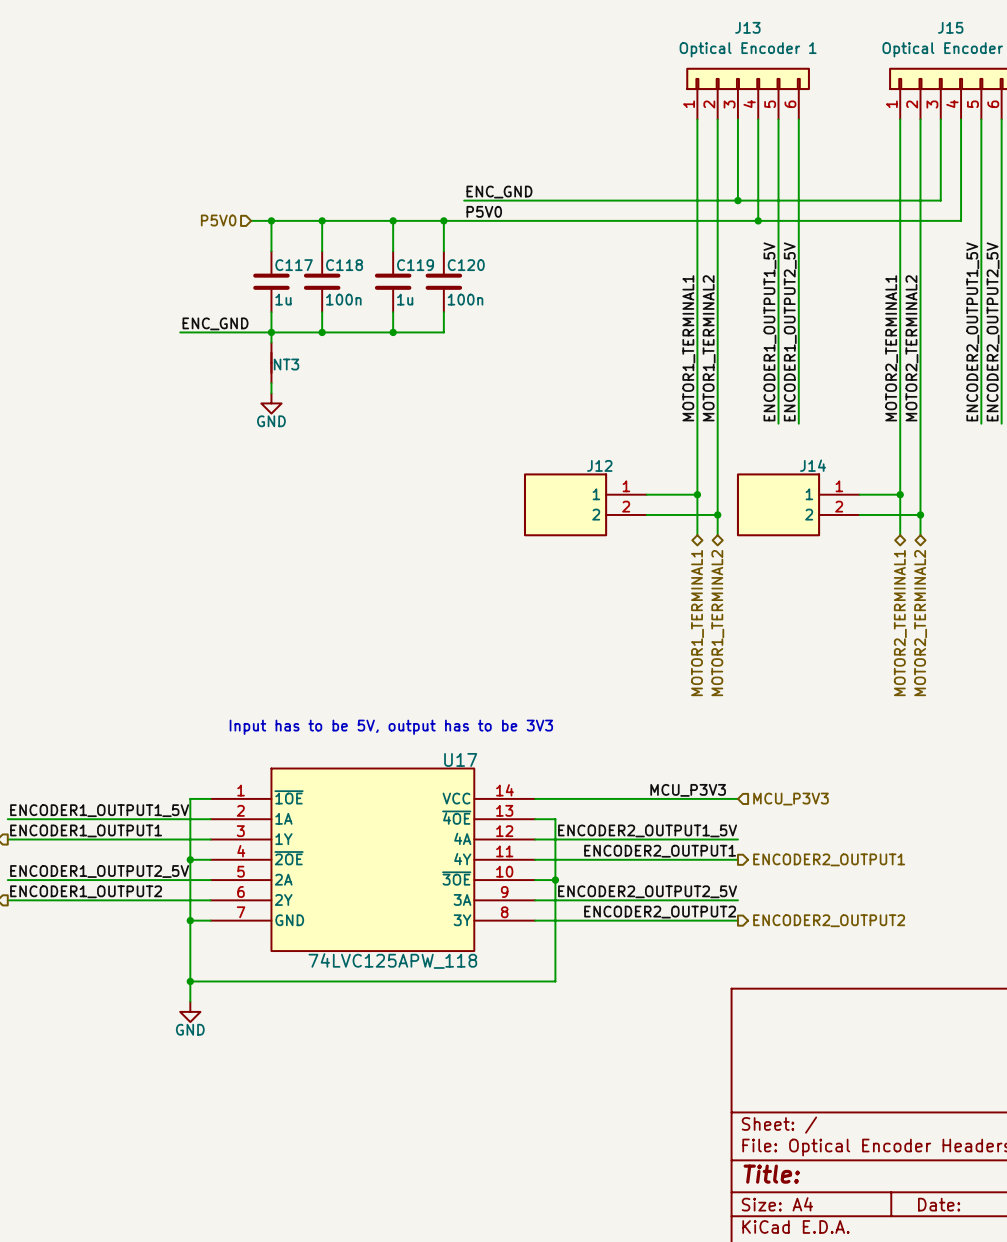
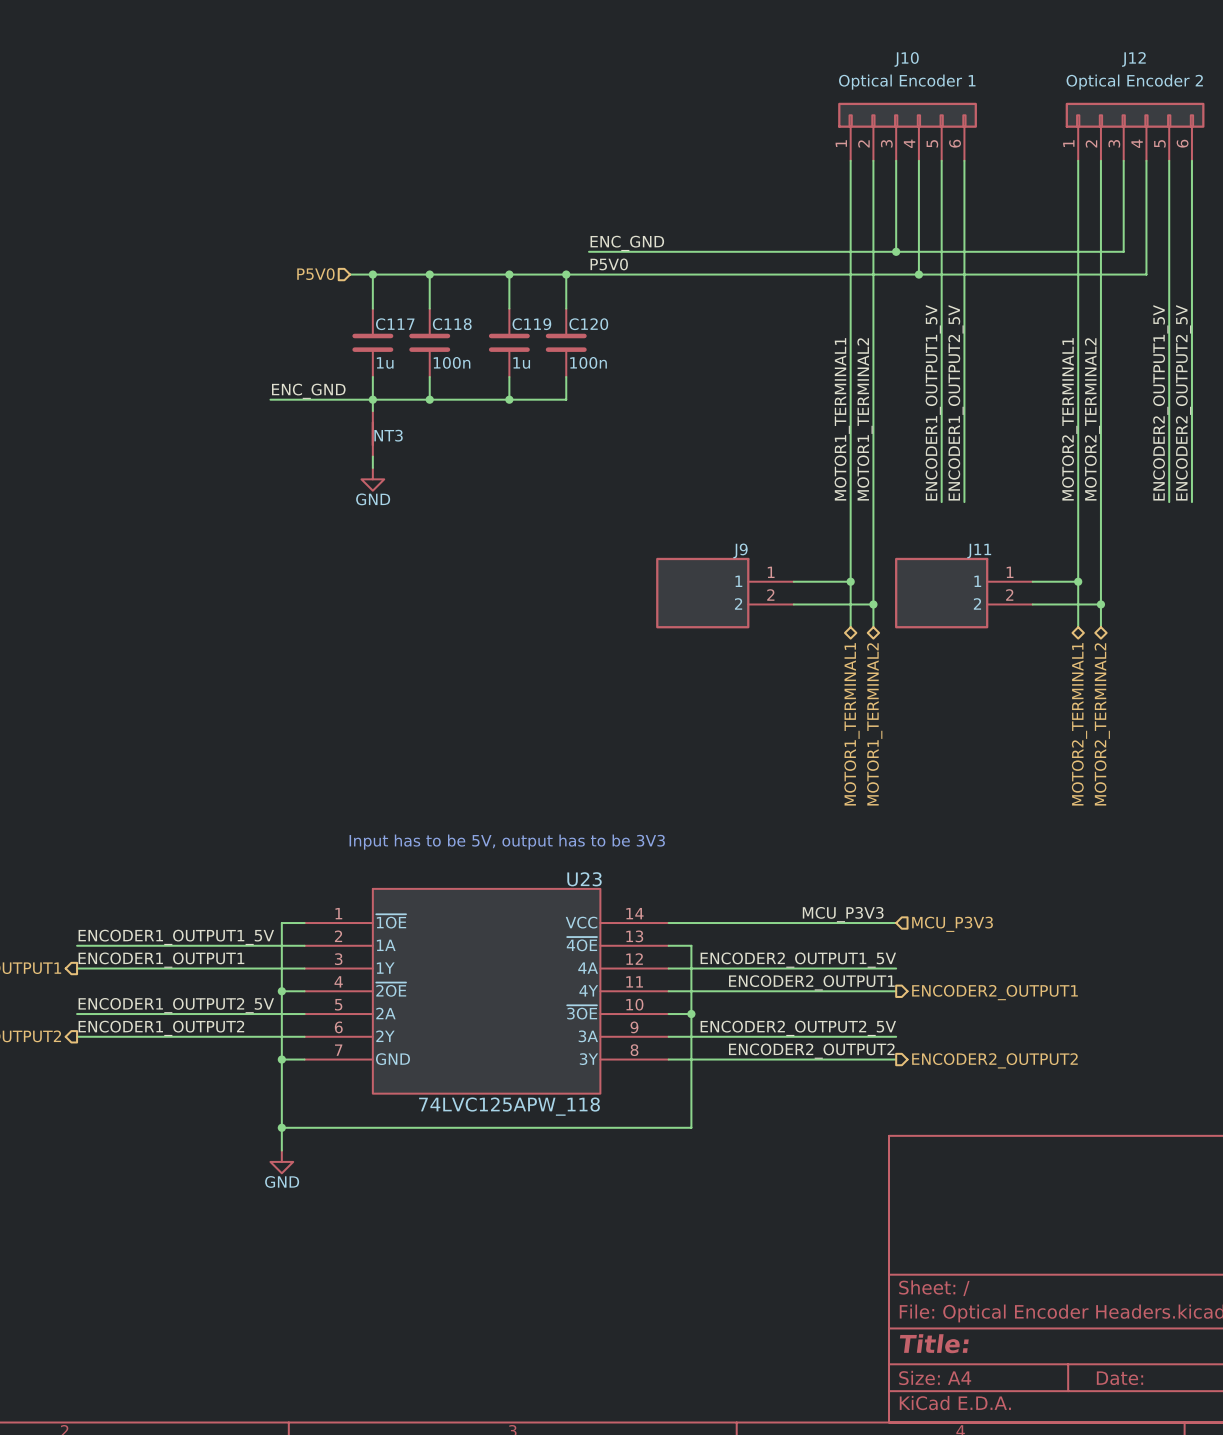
J13 name: J13 (747, 27) -> J10 (906, 59)
J15 name: J15 (950, 27) -> J12 (1133, 59)
J12 name: J12 (599, 465) -> J9 (740, 550)
J14 name: J14 (813, 465) -> J11 (979, 551)
U17 name: U17 (460, 759) -> U23 (584, 879)

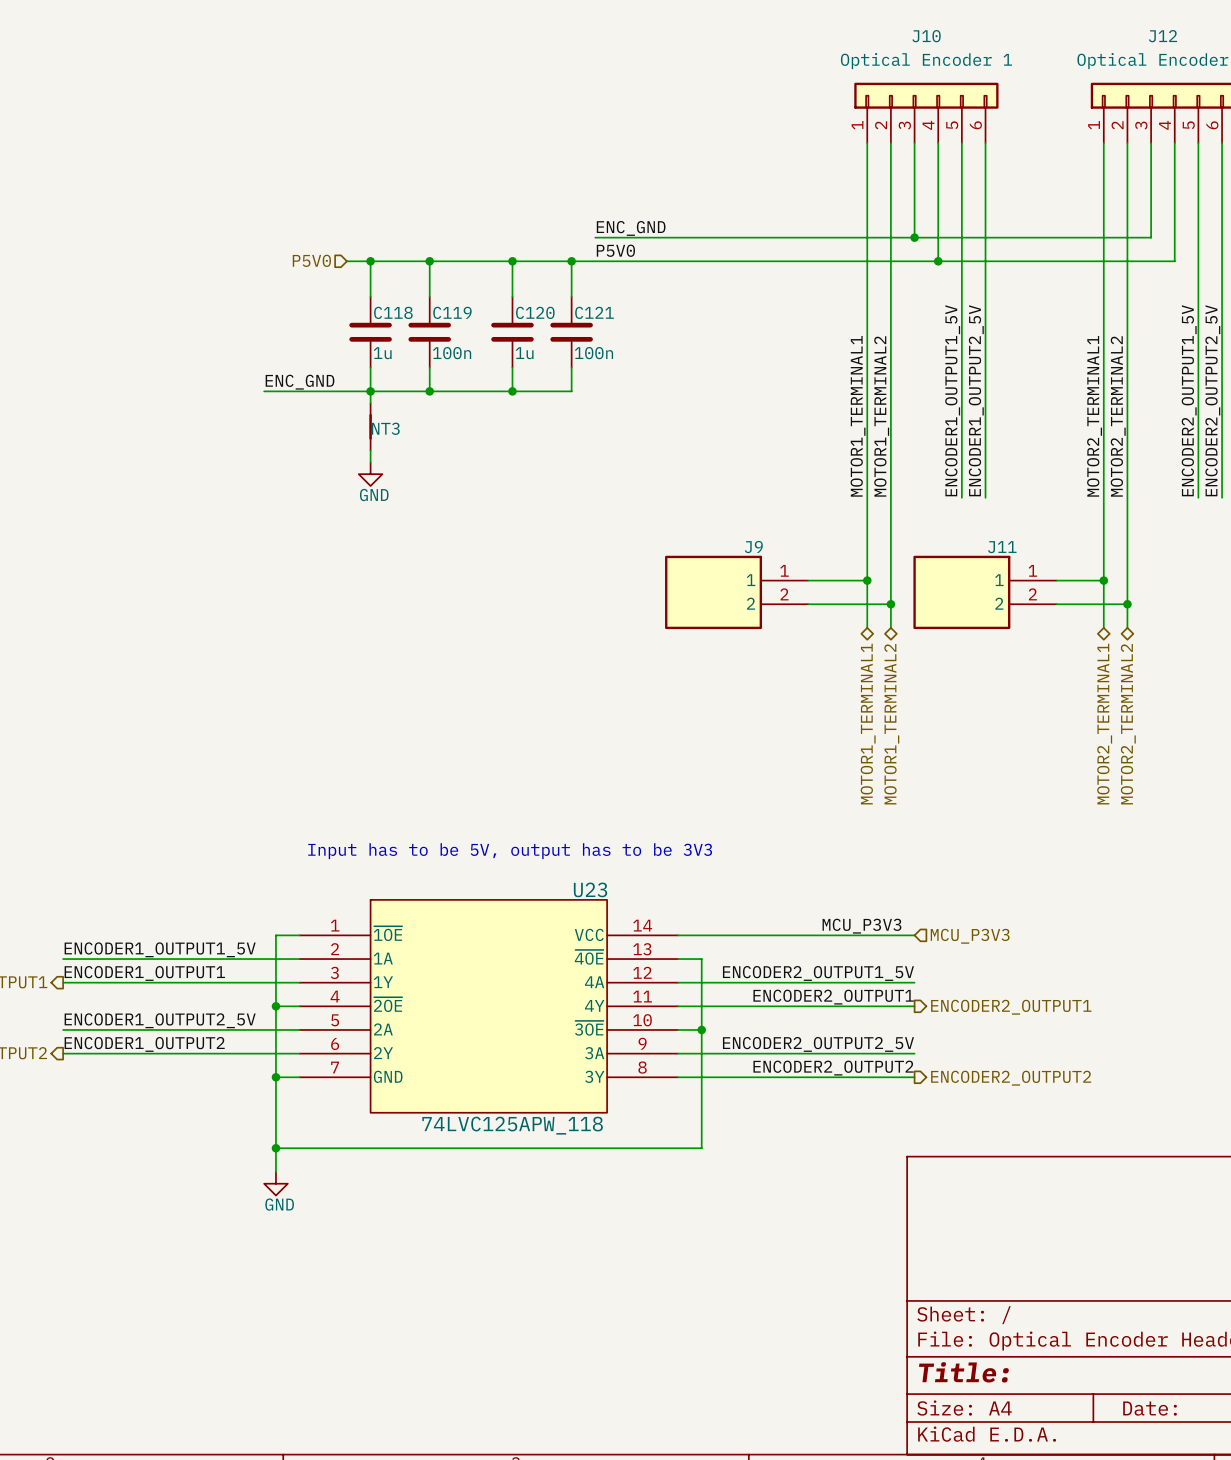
C117 name: C117 (395, 324) -> C118 (393, 312)
C118 name: C118 (452, 324) -> C119 (452, 312)
C119 name: C119 (531, 324) -> C120 (535, 312)
C120 name: C120 (588, 324) -> C121 (594, 312)

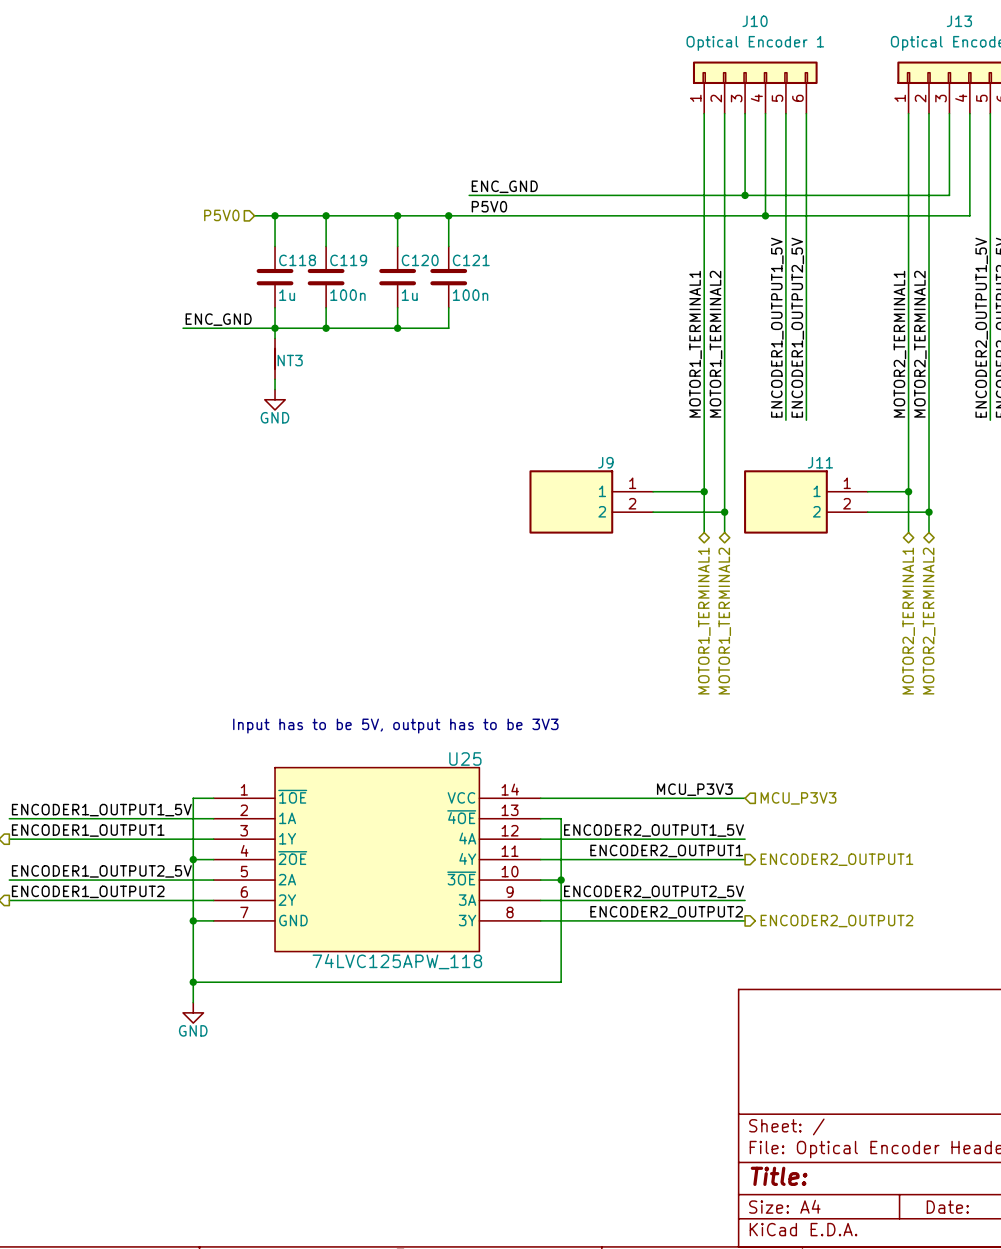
J12 name: J12 (1163, 36) -> J13 (959, 21)
U23 name: U23 (590, 889) -> U25 (465, 759)

